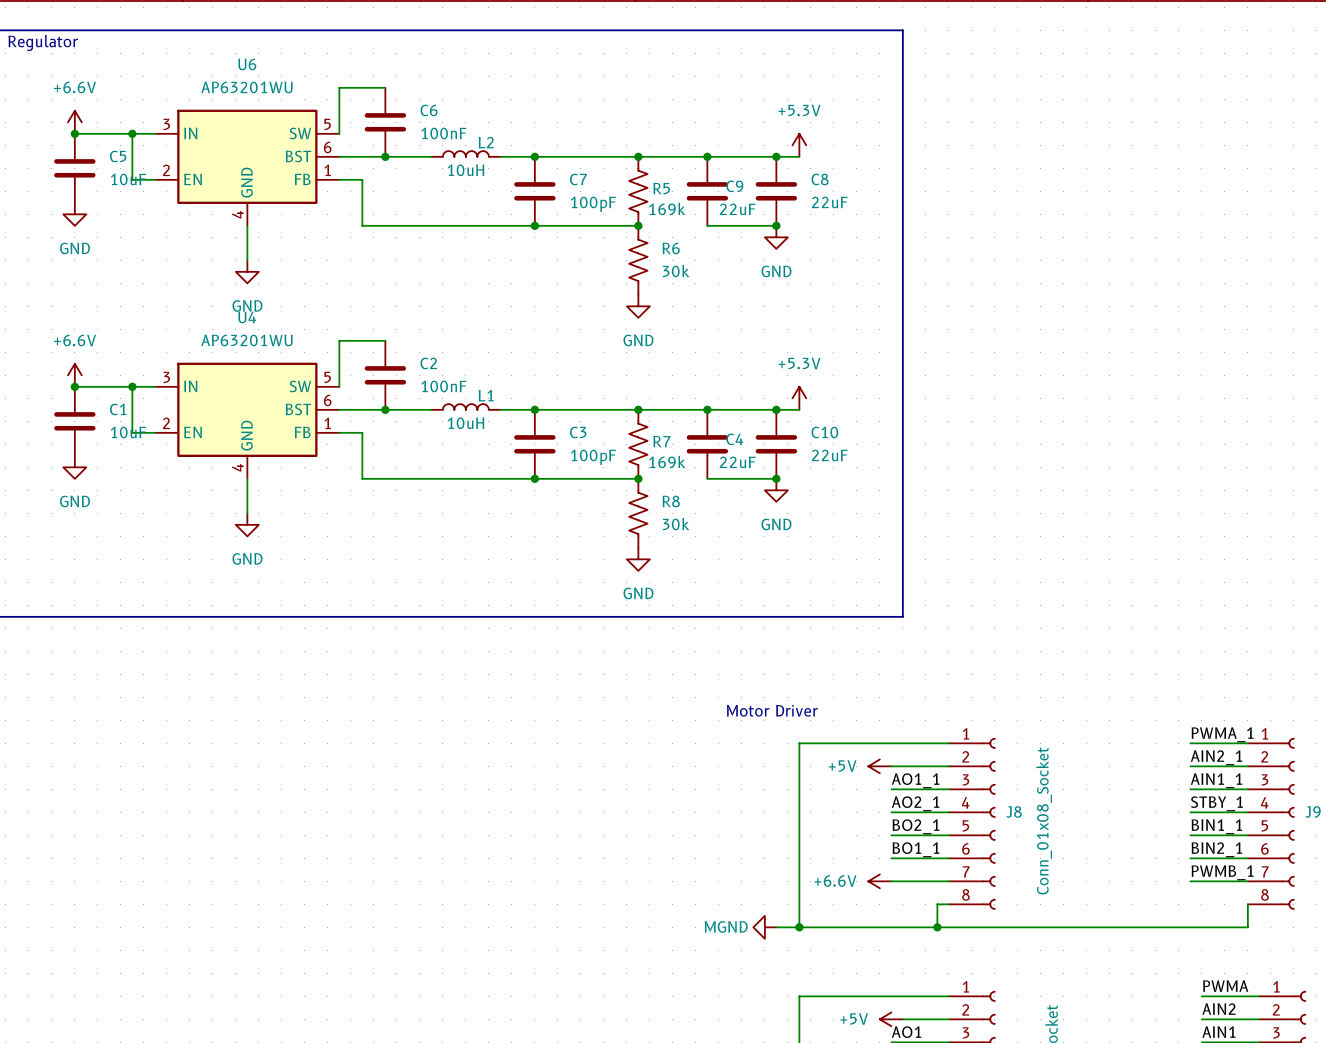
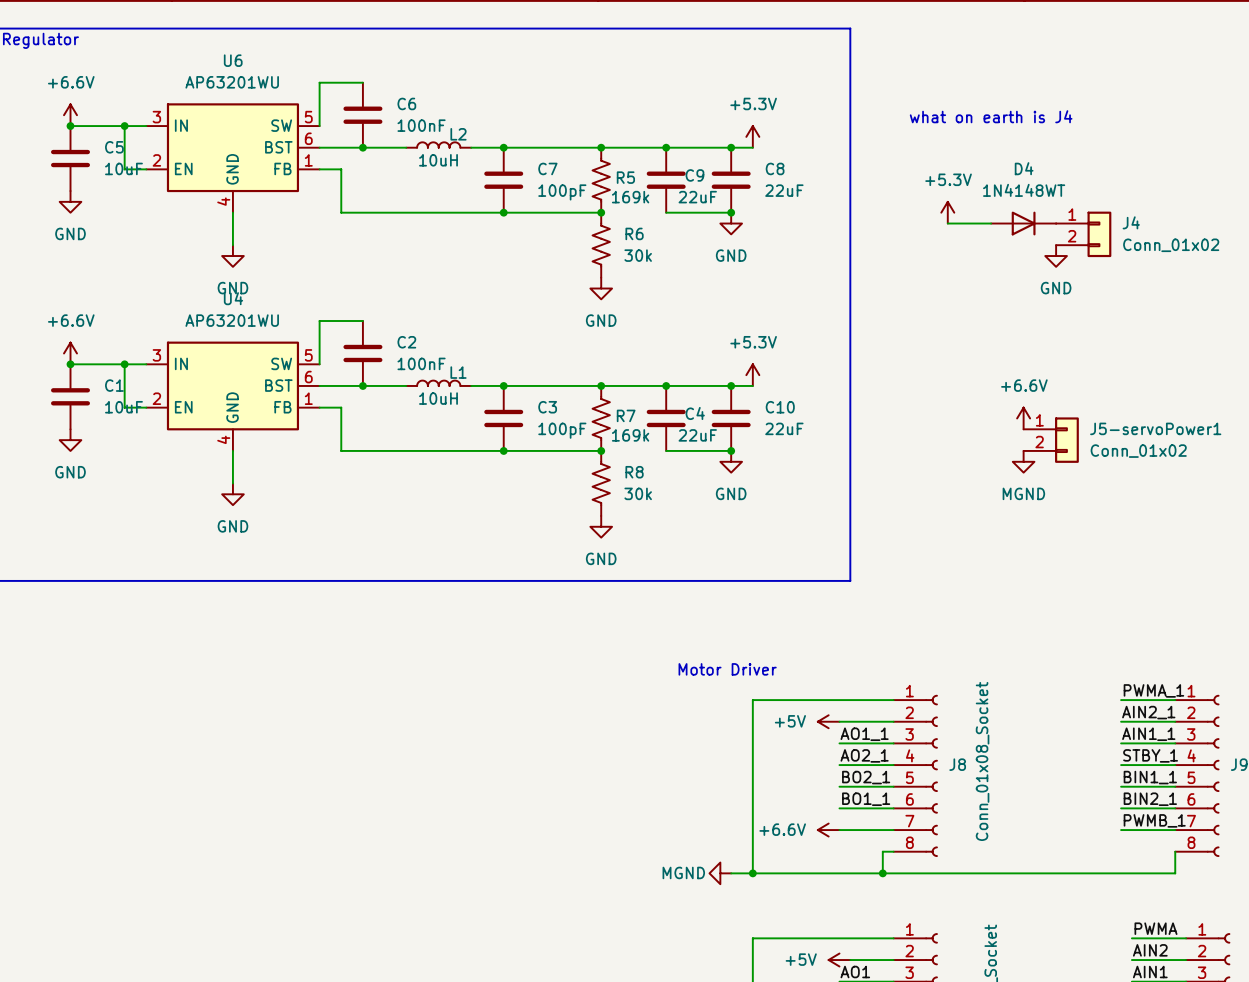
text: none -> what on earth is J4 (991, 116)
power symbol: none -> +5.3V (947, 212)
wire: none -> (947, 223) (991, 223)
D4: none -> 1N4148WT (1023, 223)
J4: none -> Conn_01x02 (1083, 234)
power symbol: none -> GND (1056, 256)
power symbol: none -> +6.6V (1023, 418)
J5-servoPower1: none -> Conn_01x02 (1051, 440)
power symbol: none -> MGND (1023, 461)

